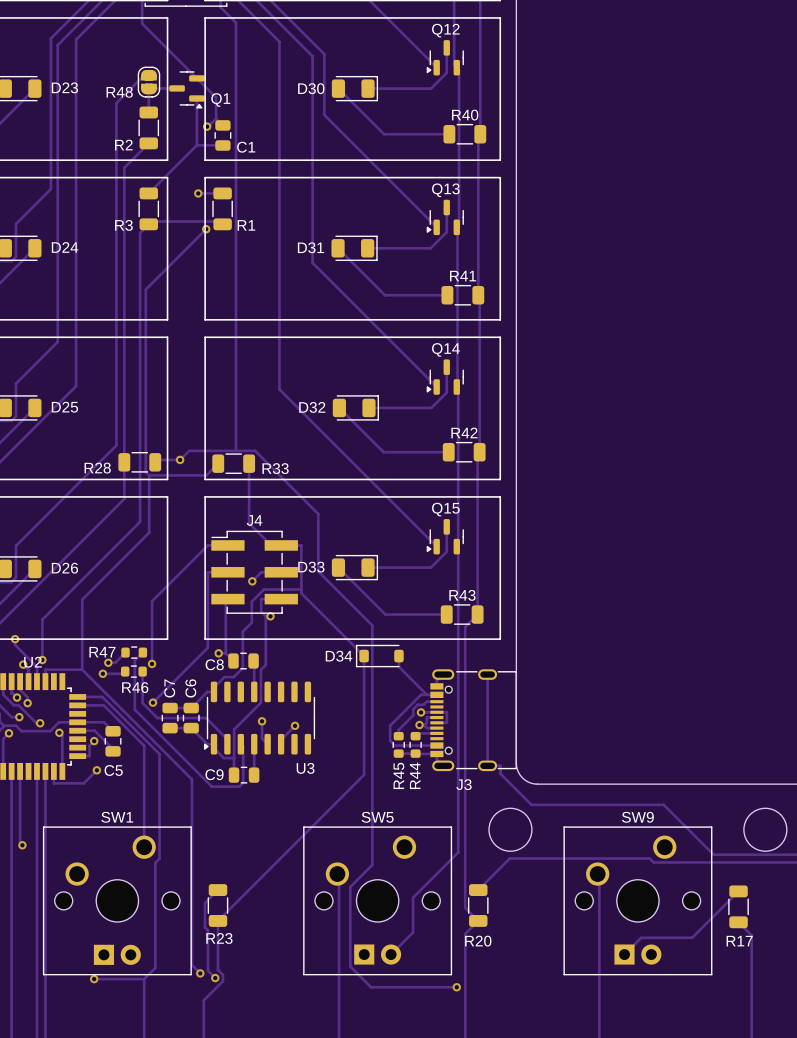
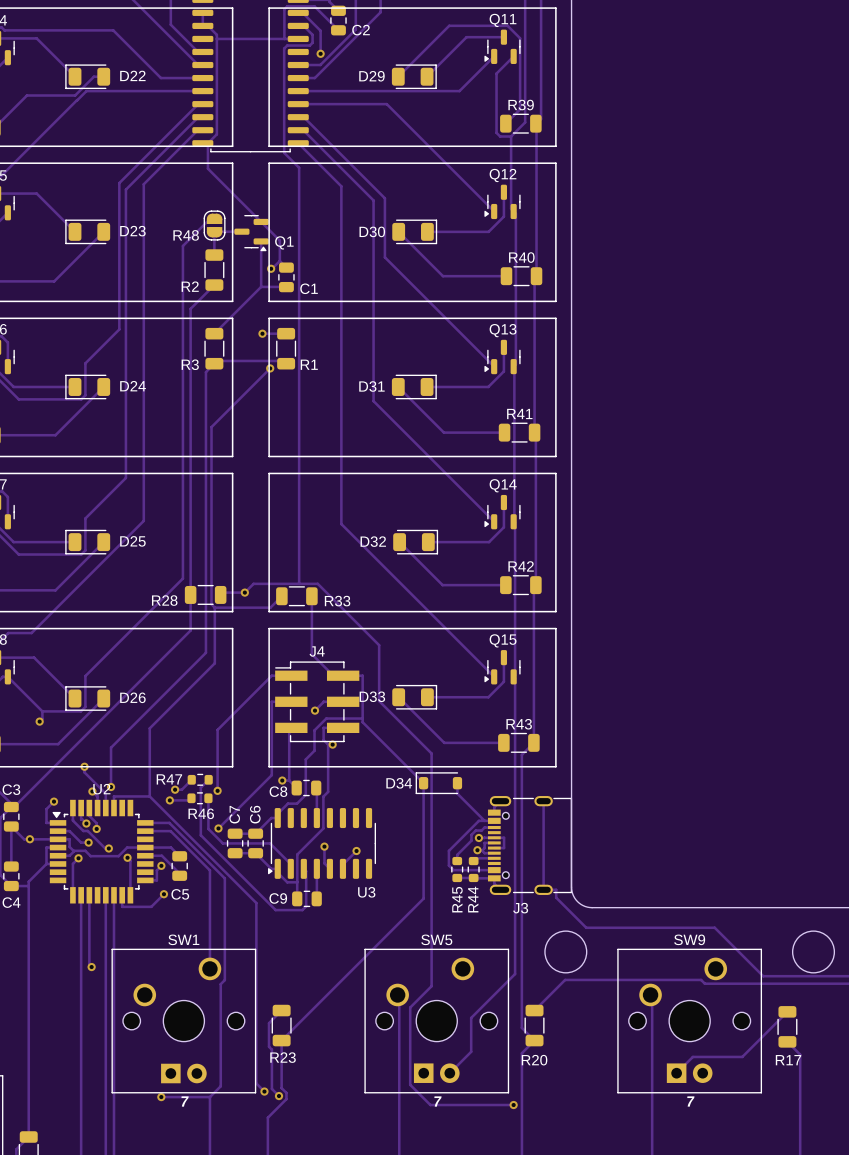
SW1 text: none -> 7 (185, 1101)
SW5 text: none -> 7 (437, 1101)
SW9 text: none -> 7 (690, 1101)

